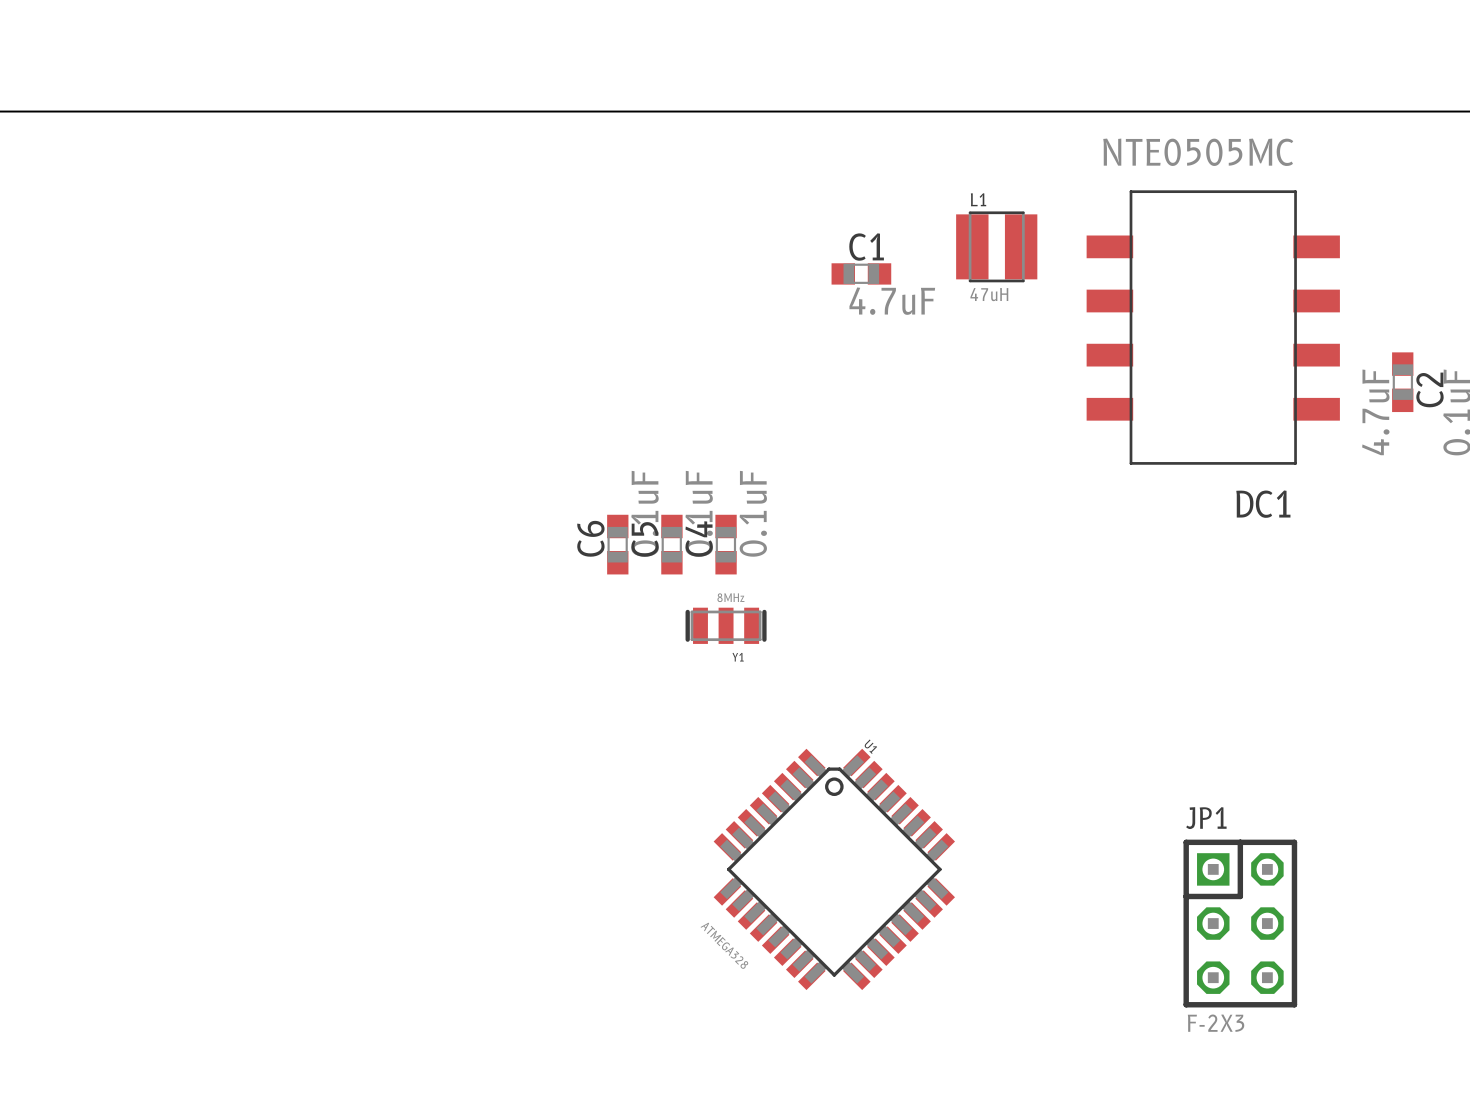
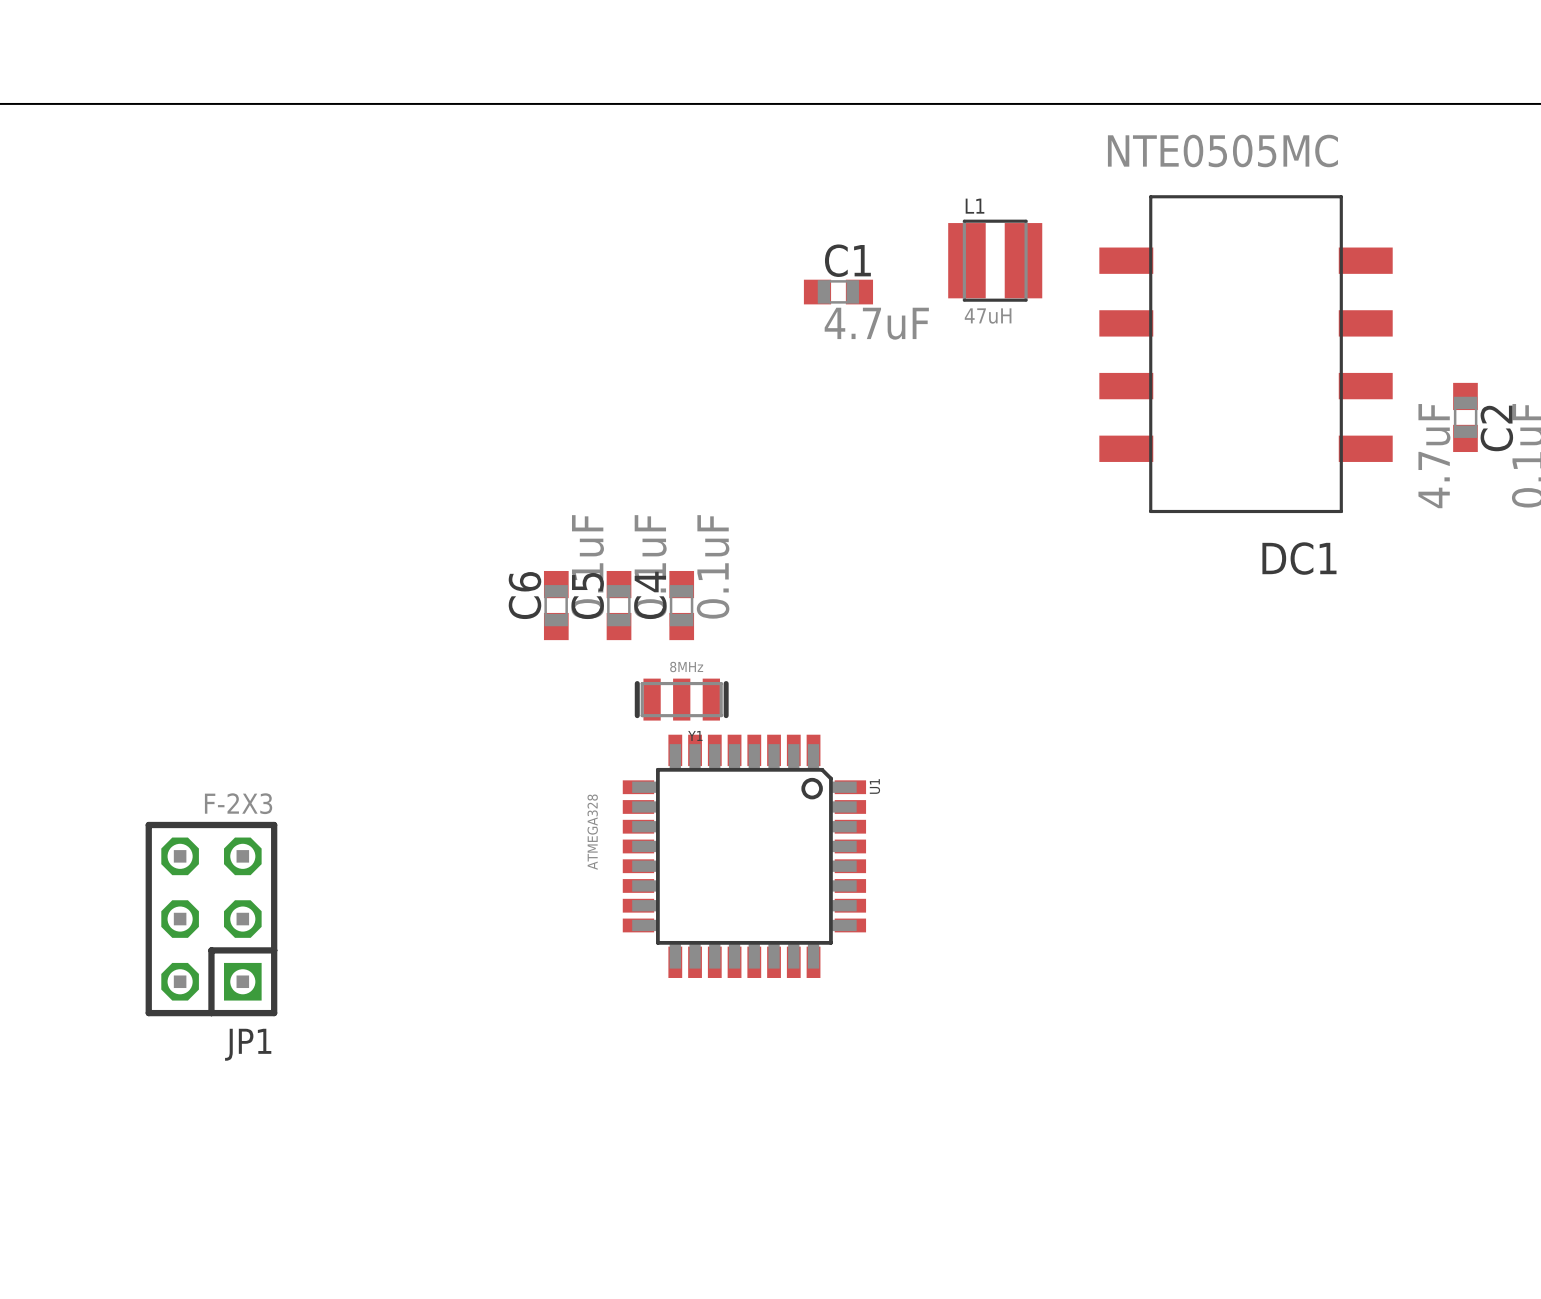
U1 rotation: 0° (834, 869) -> 45° clockwise (744, 856)
JP1 rotation: 0° (1240, 923) -> 180° (211, 919)
JP1 position: (1240, 923) -> (211, 919)

